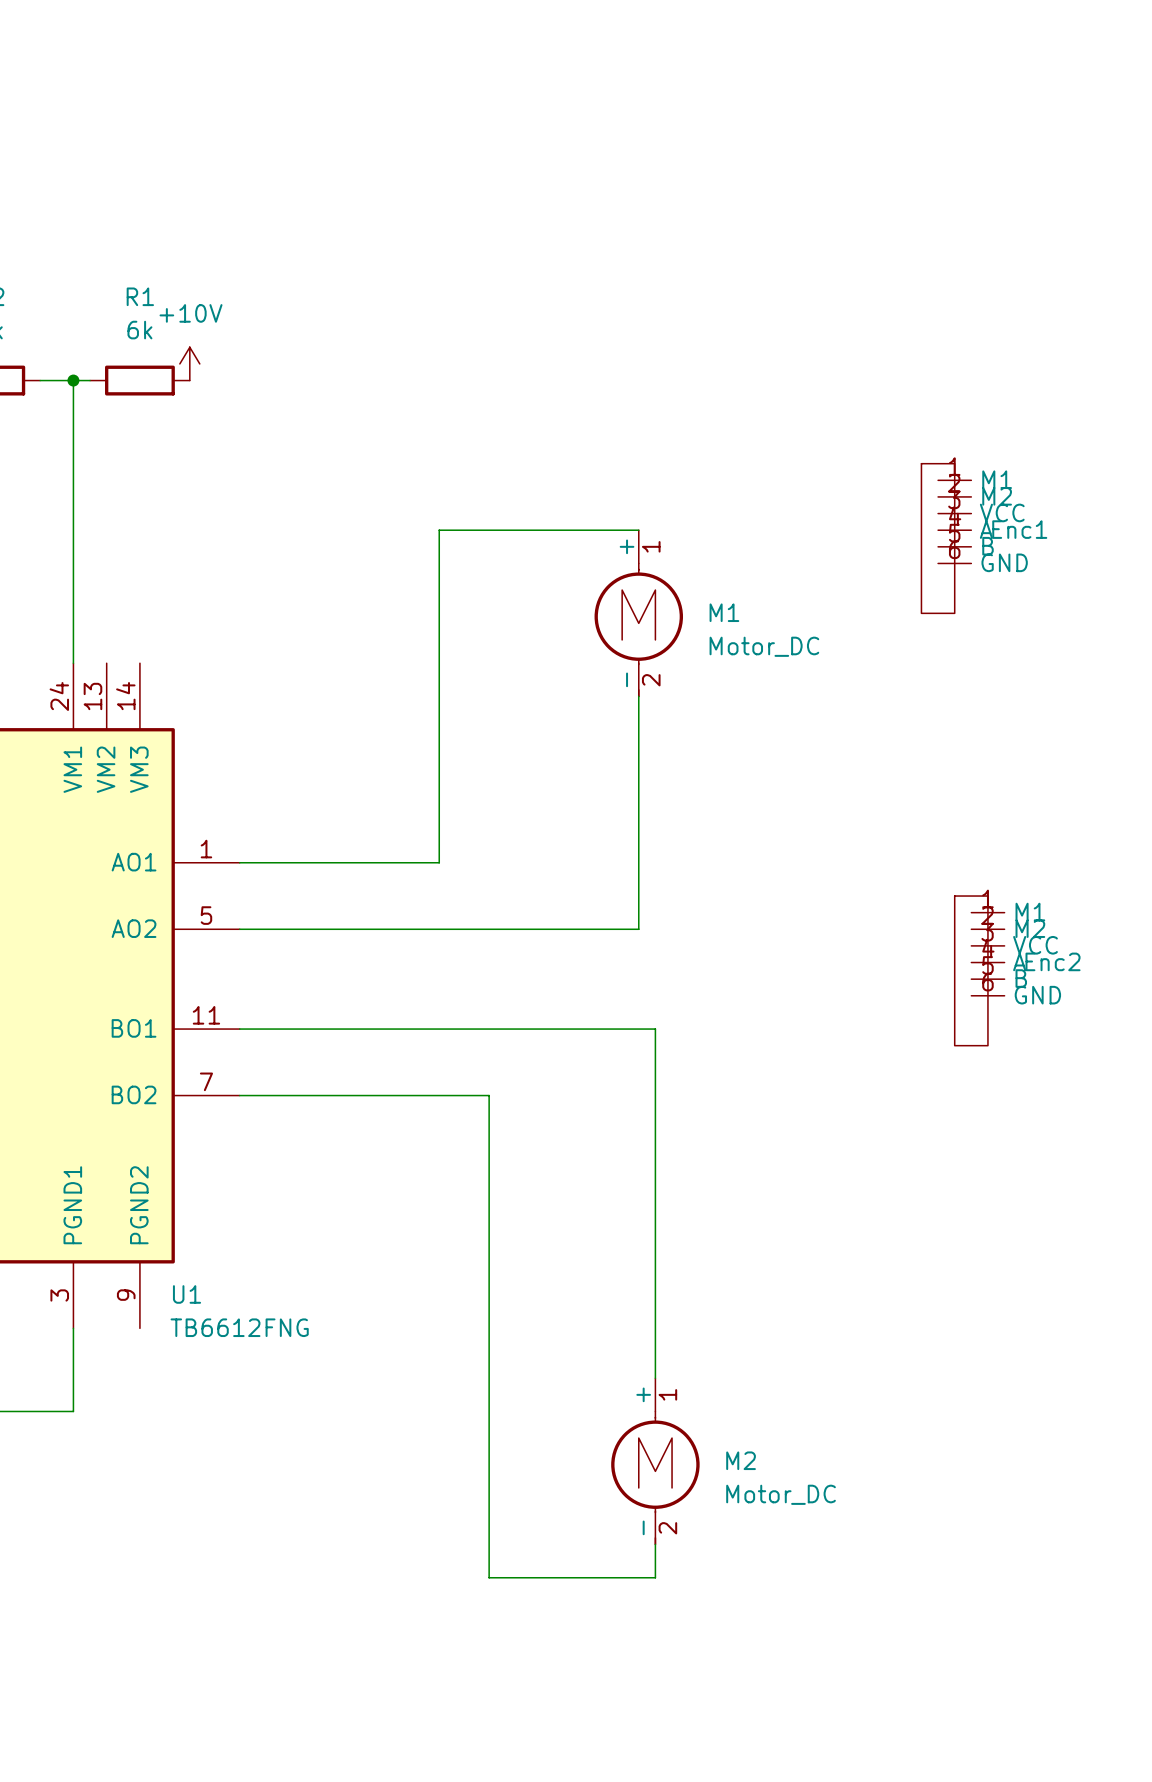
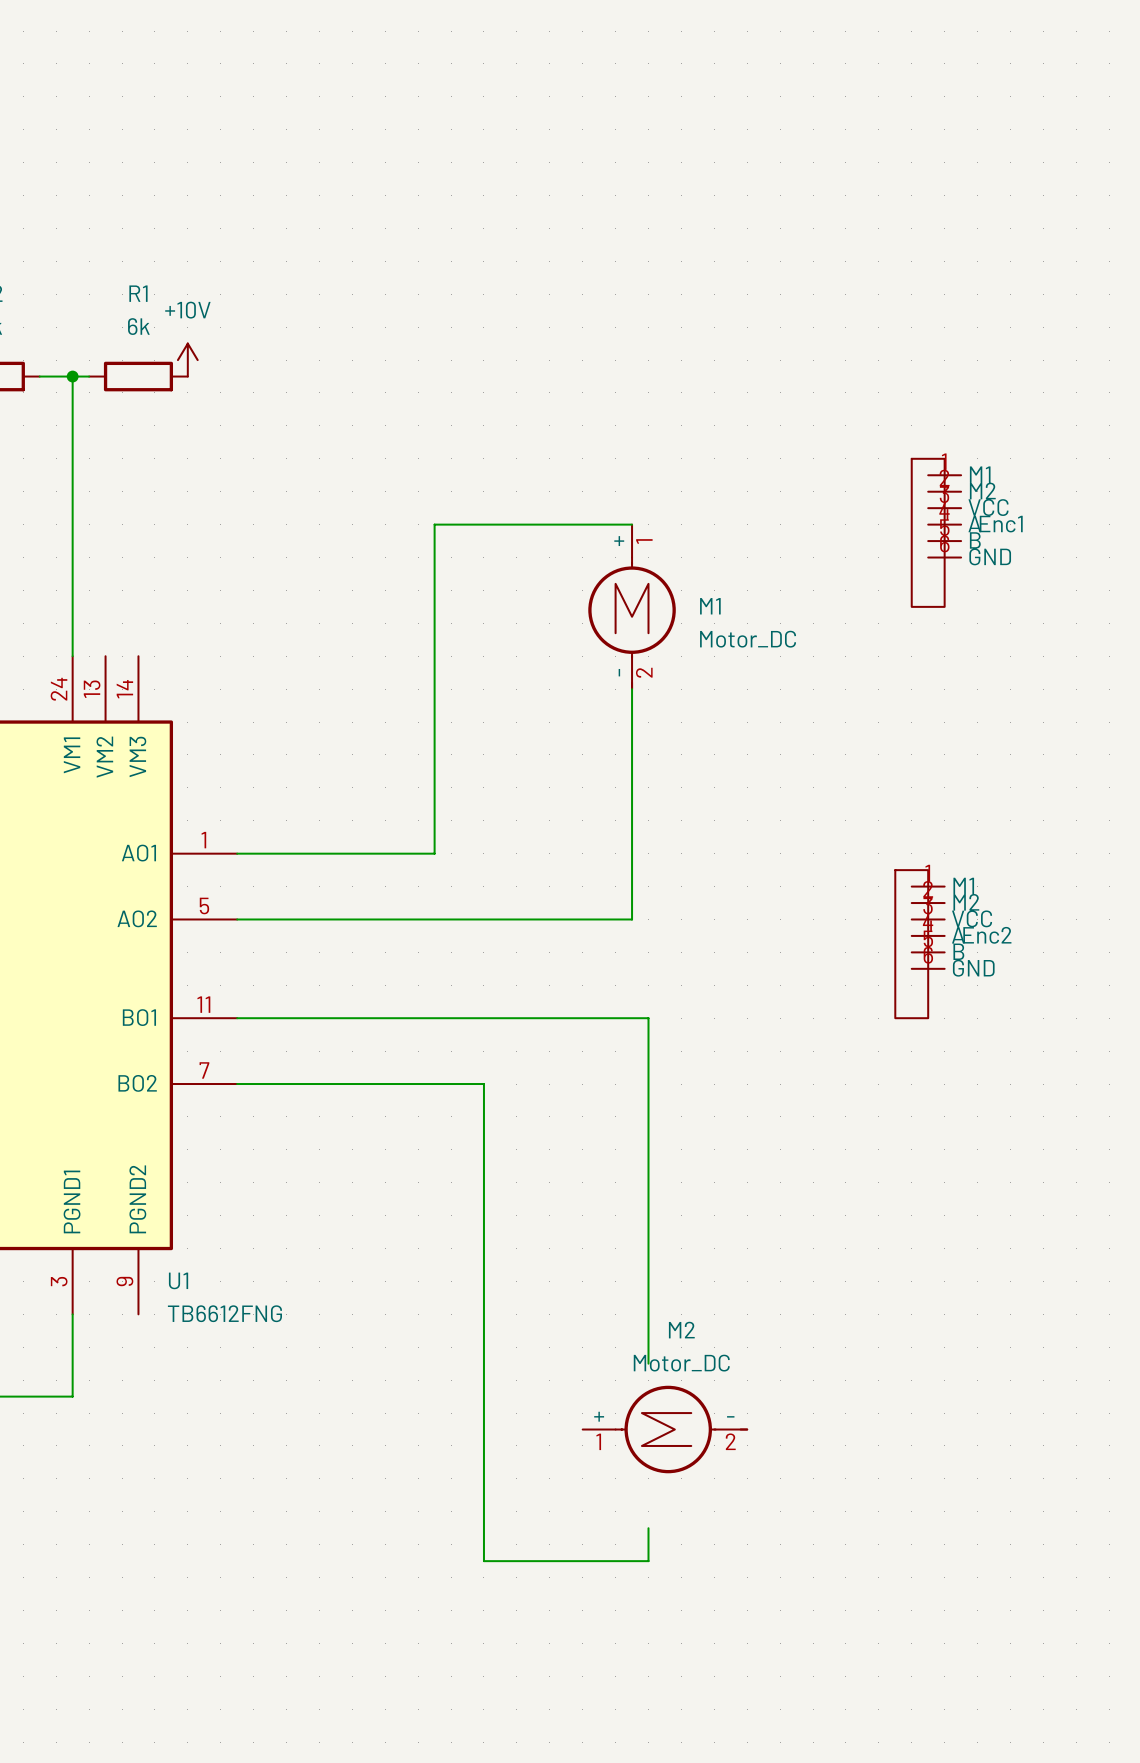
Enc2 position: (979, 970) -> (919, 944)
M2 rotation: 0° (655, 1477) -> 90° counterclockwise (681, 1429)
M2 value position: Motor_DC (781, 1494) -> Motor_DC (681, 1363)

